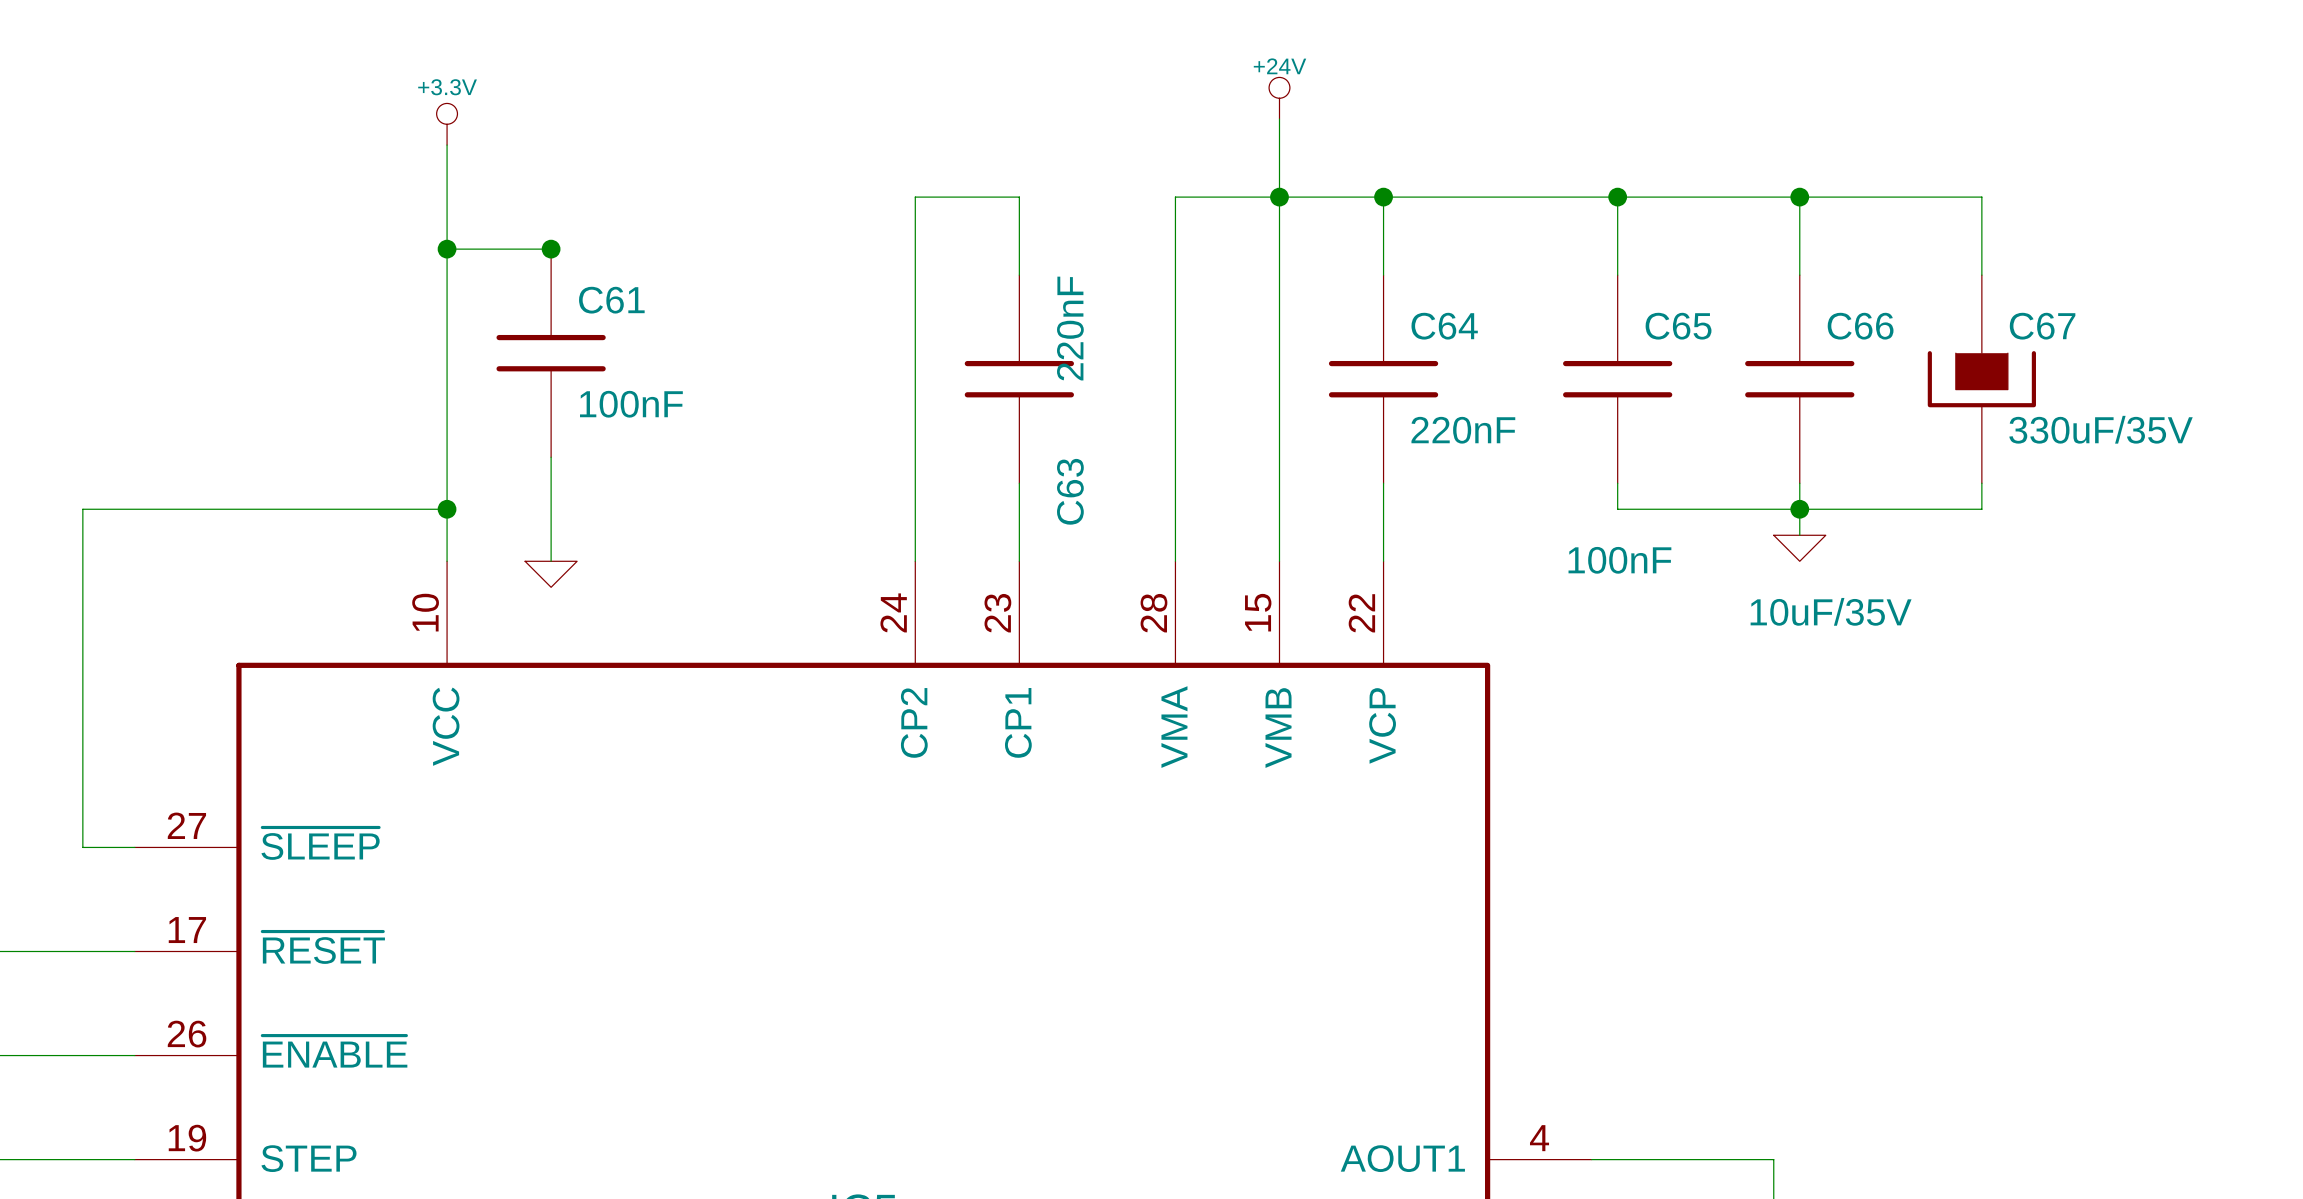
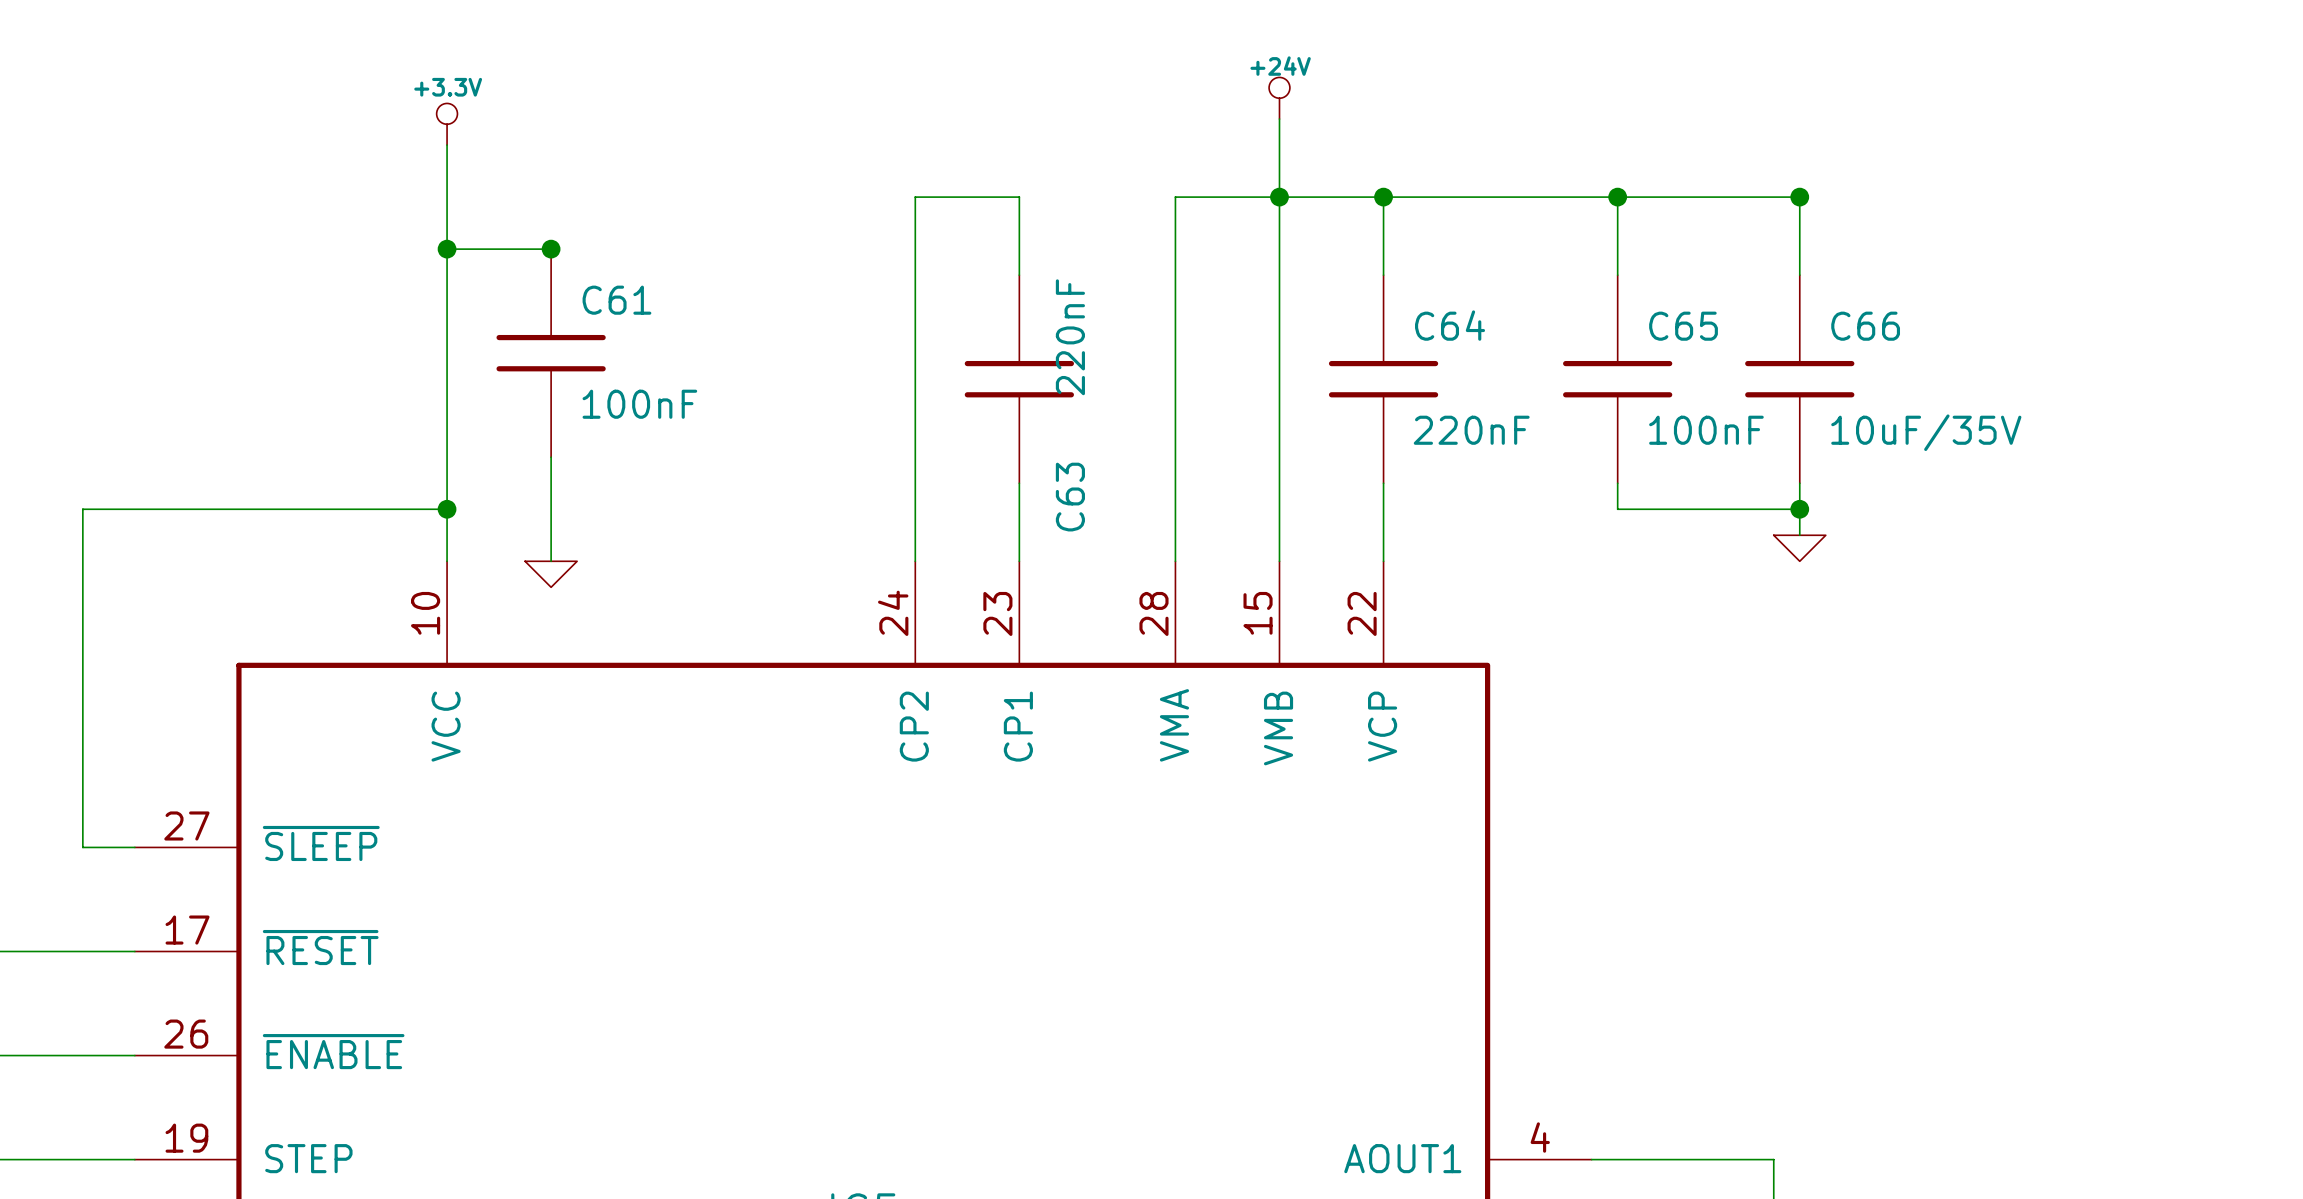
wire: (1799, 197) (1981, 197) (1981, 275) -> none
C67: 330uF/35V (1981, 379) -> none
wire: (1981, 483) (1981, 509) (1799, 509) -> none
C65 value position: 100nF (1619, 560) -> 100nF (1706, 430)
C66 value position: 10uF/35V (1831, 611) -> 10uF/35V (1926, 432)

